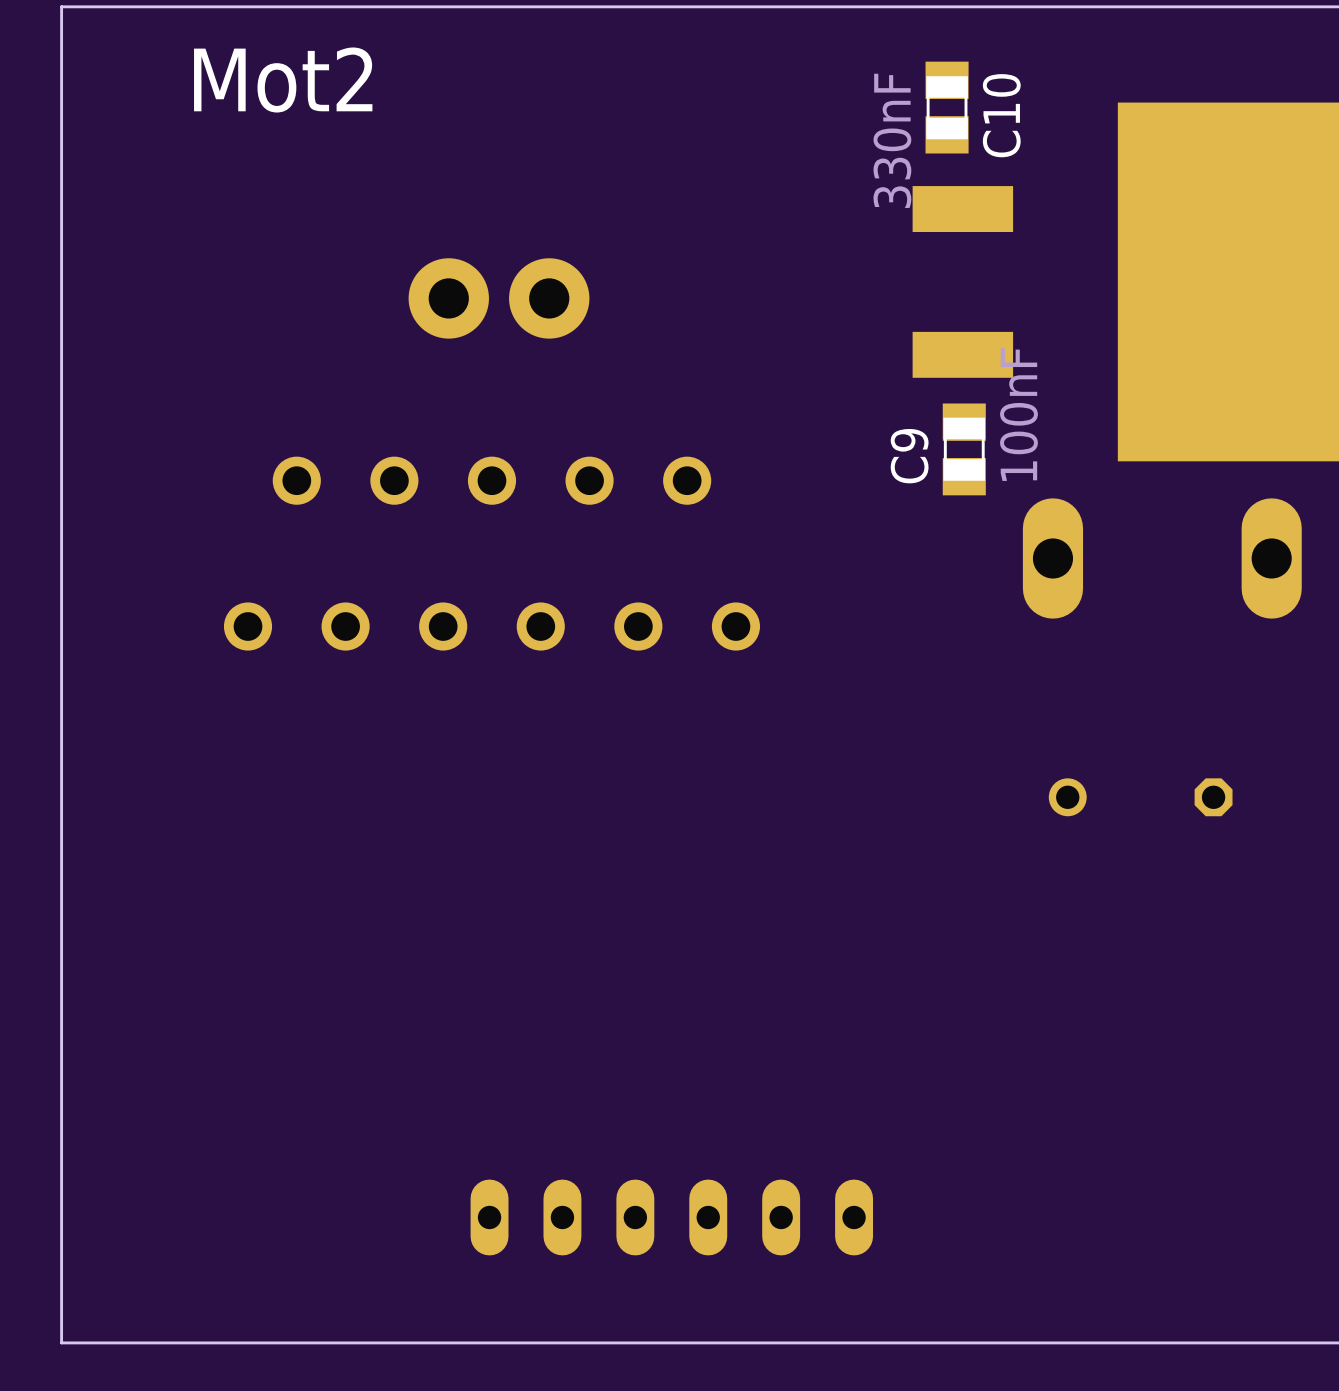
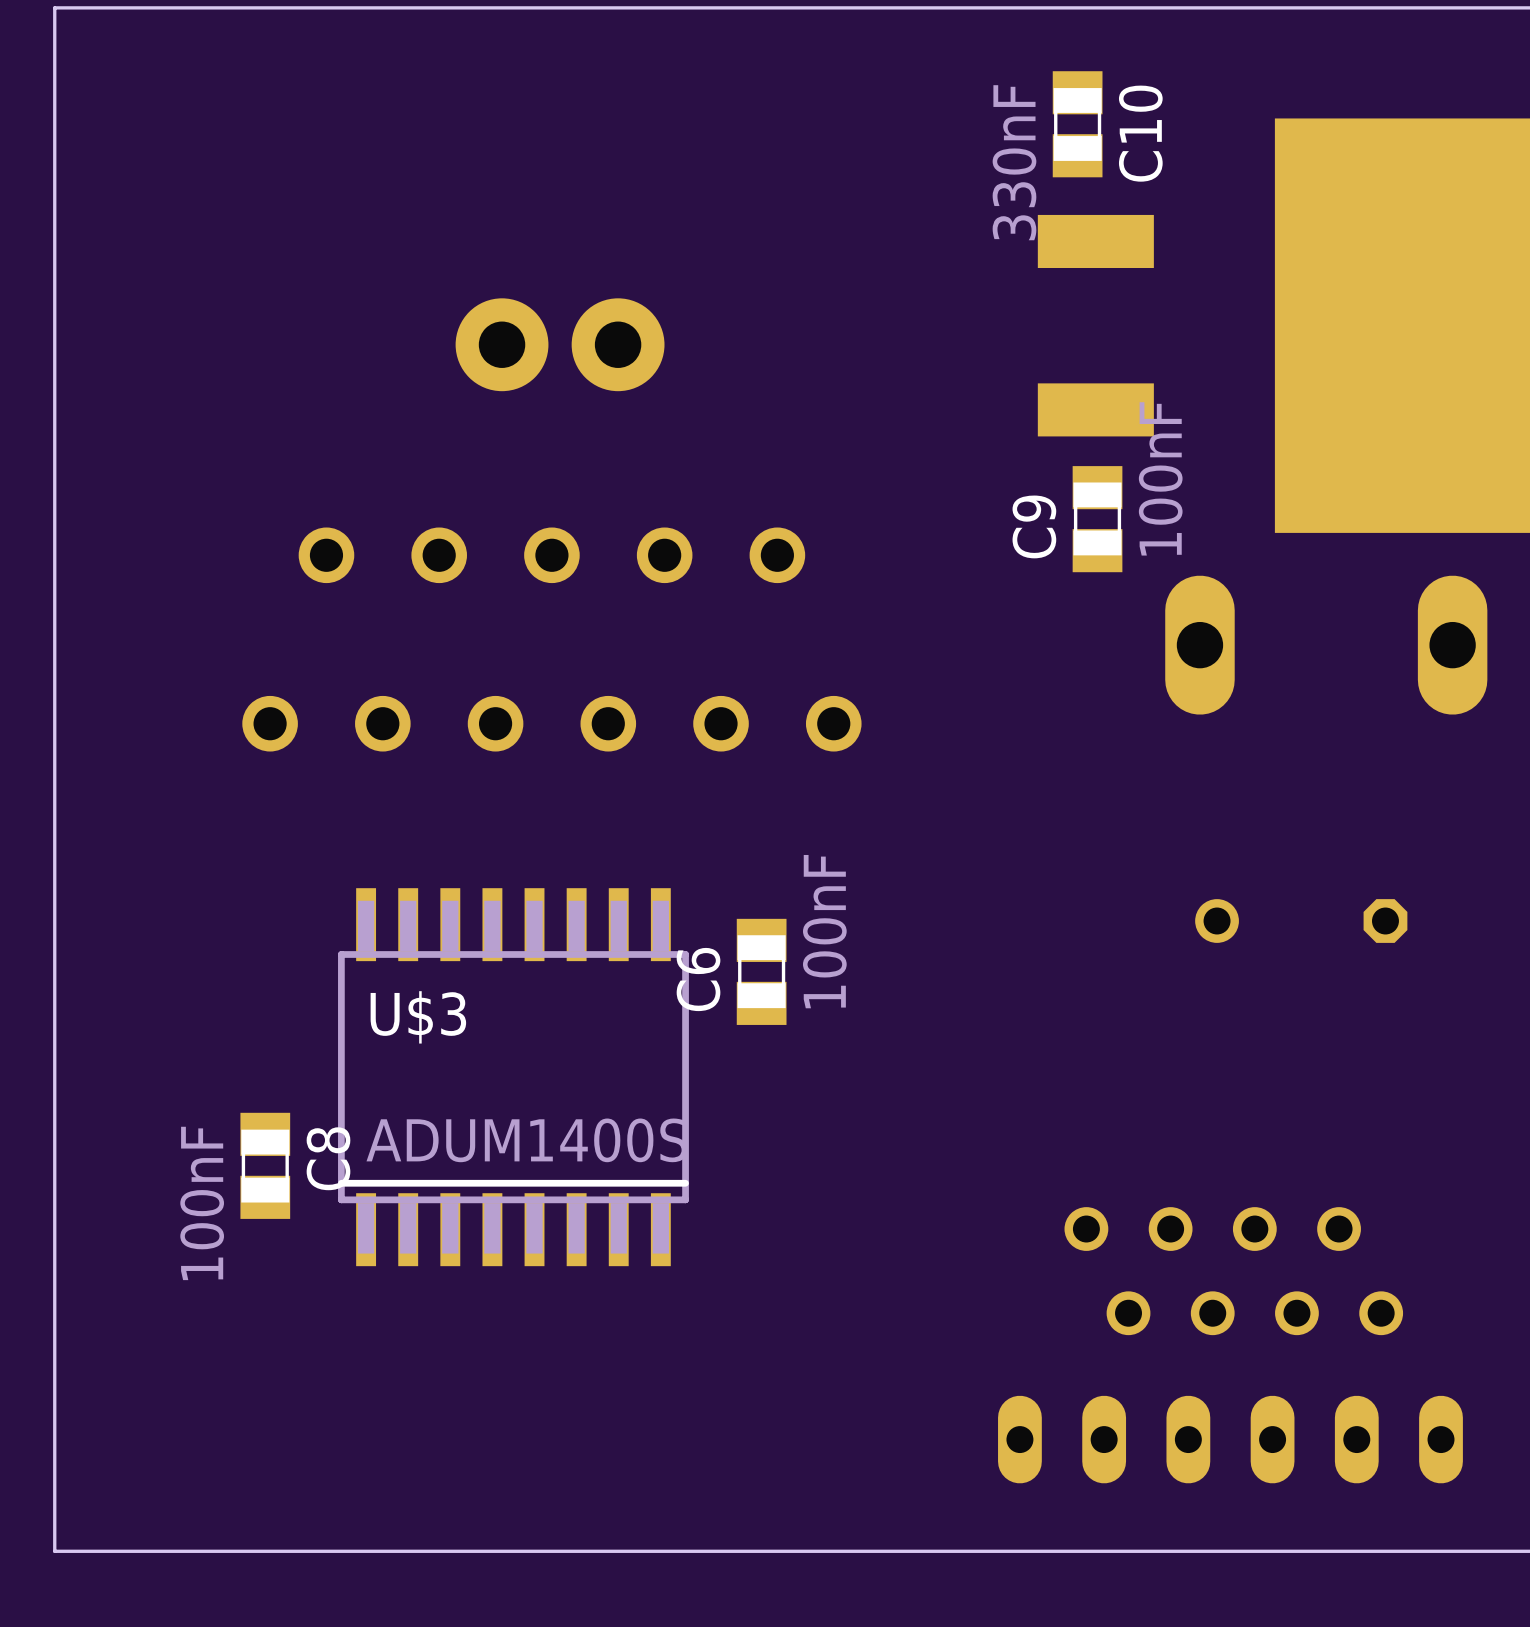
text: Mot2 (283, 80) -> none
C6: none -> 100nF (761, 971)
U$3: none -> ADUM1400S (513, 1077)
C8: none -> 100nF (265, 1165)
part: none -> (1233, 1271)
part position: (671, 1217) -> (1230, 1439)

